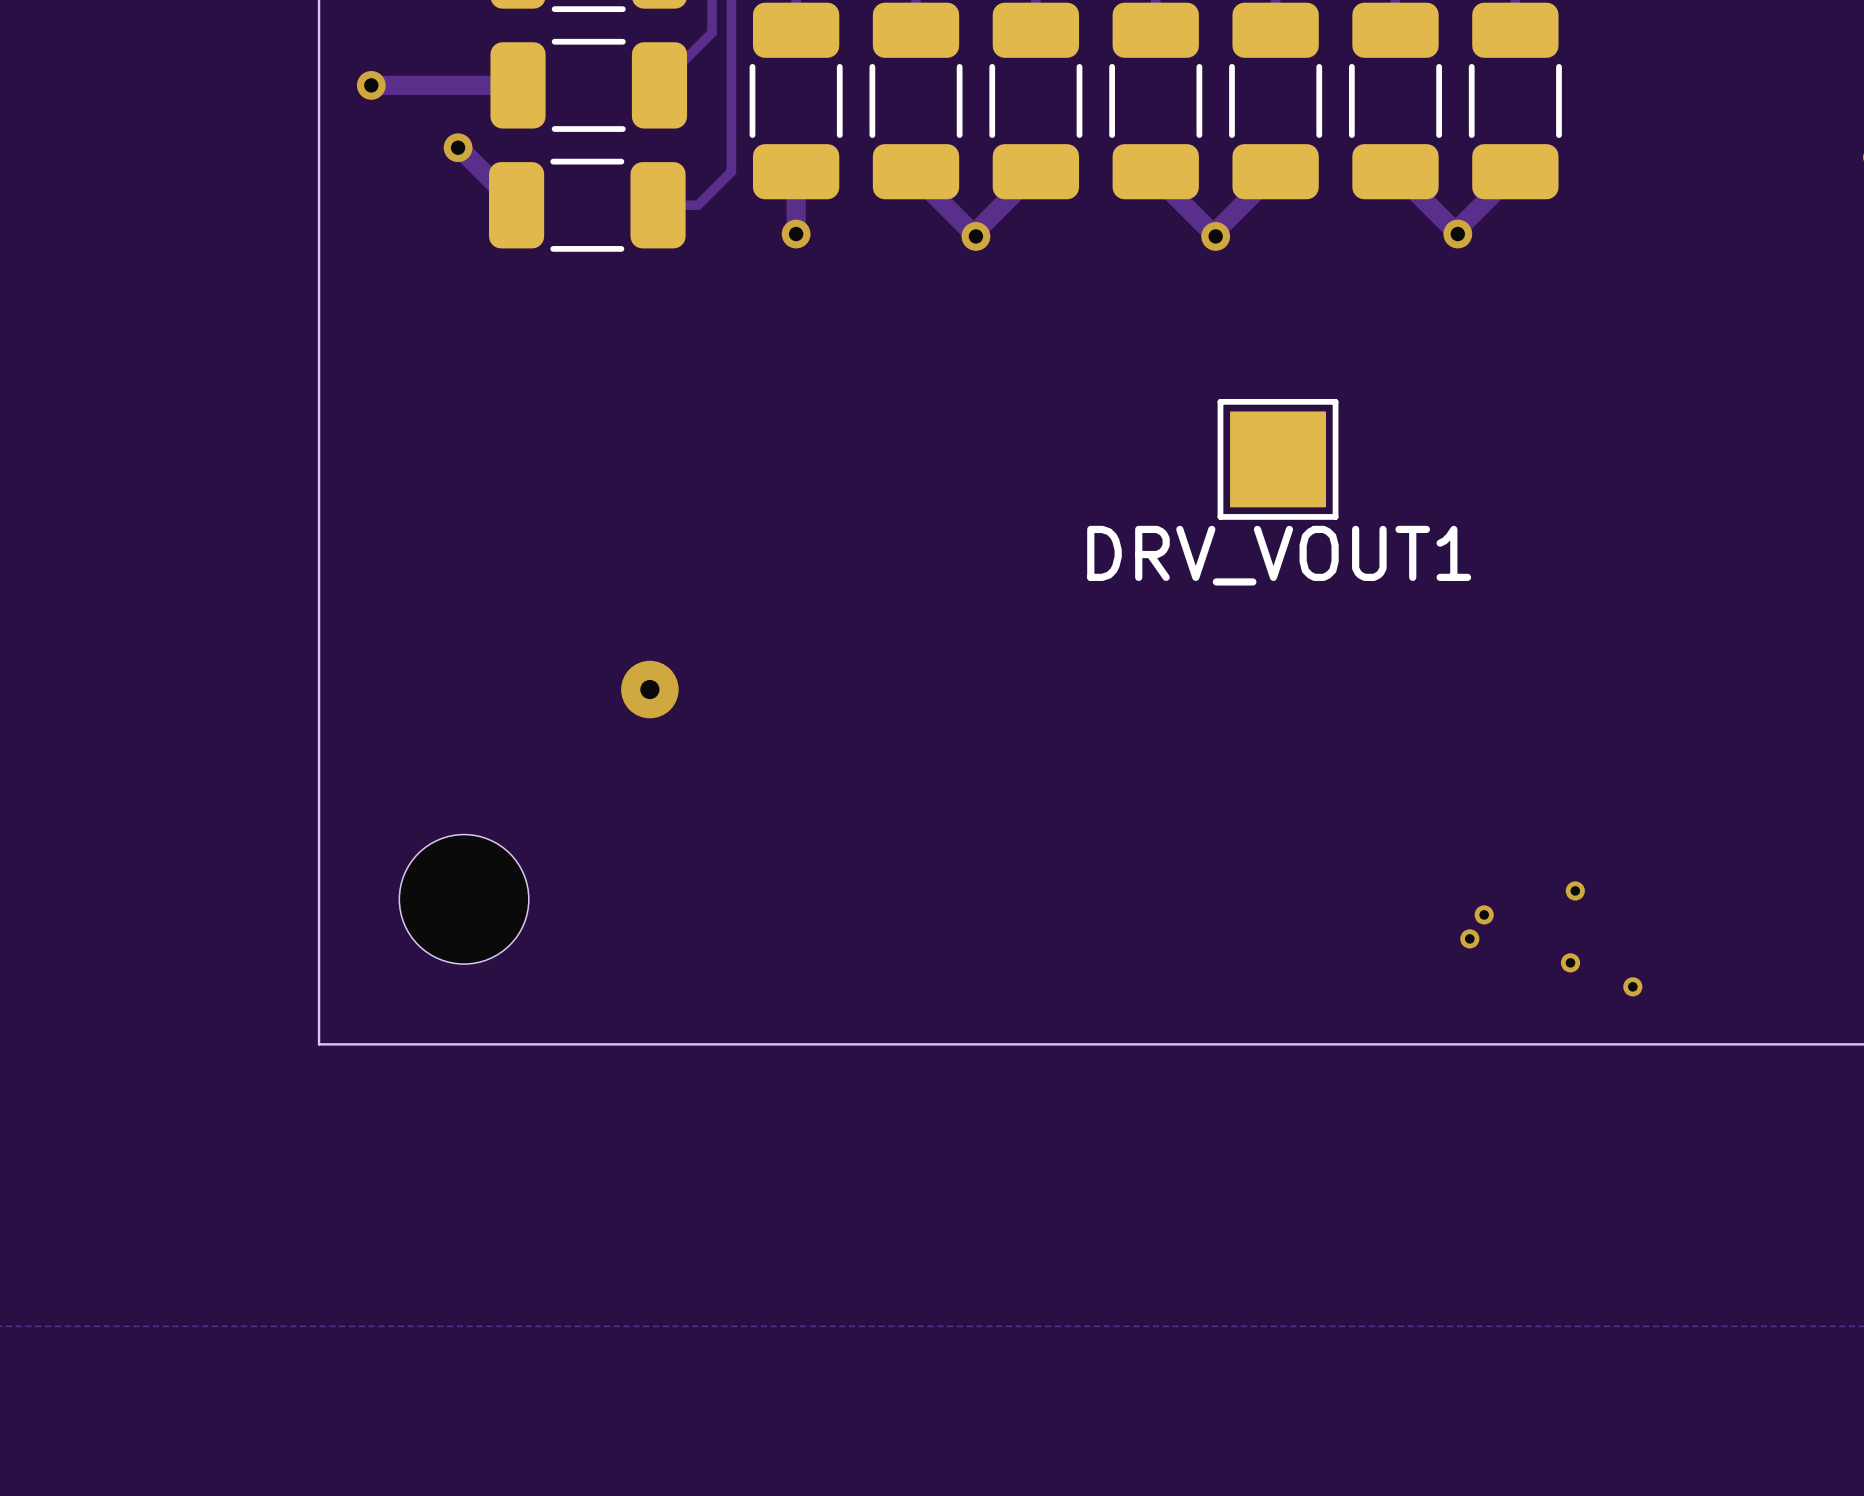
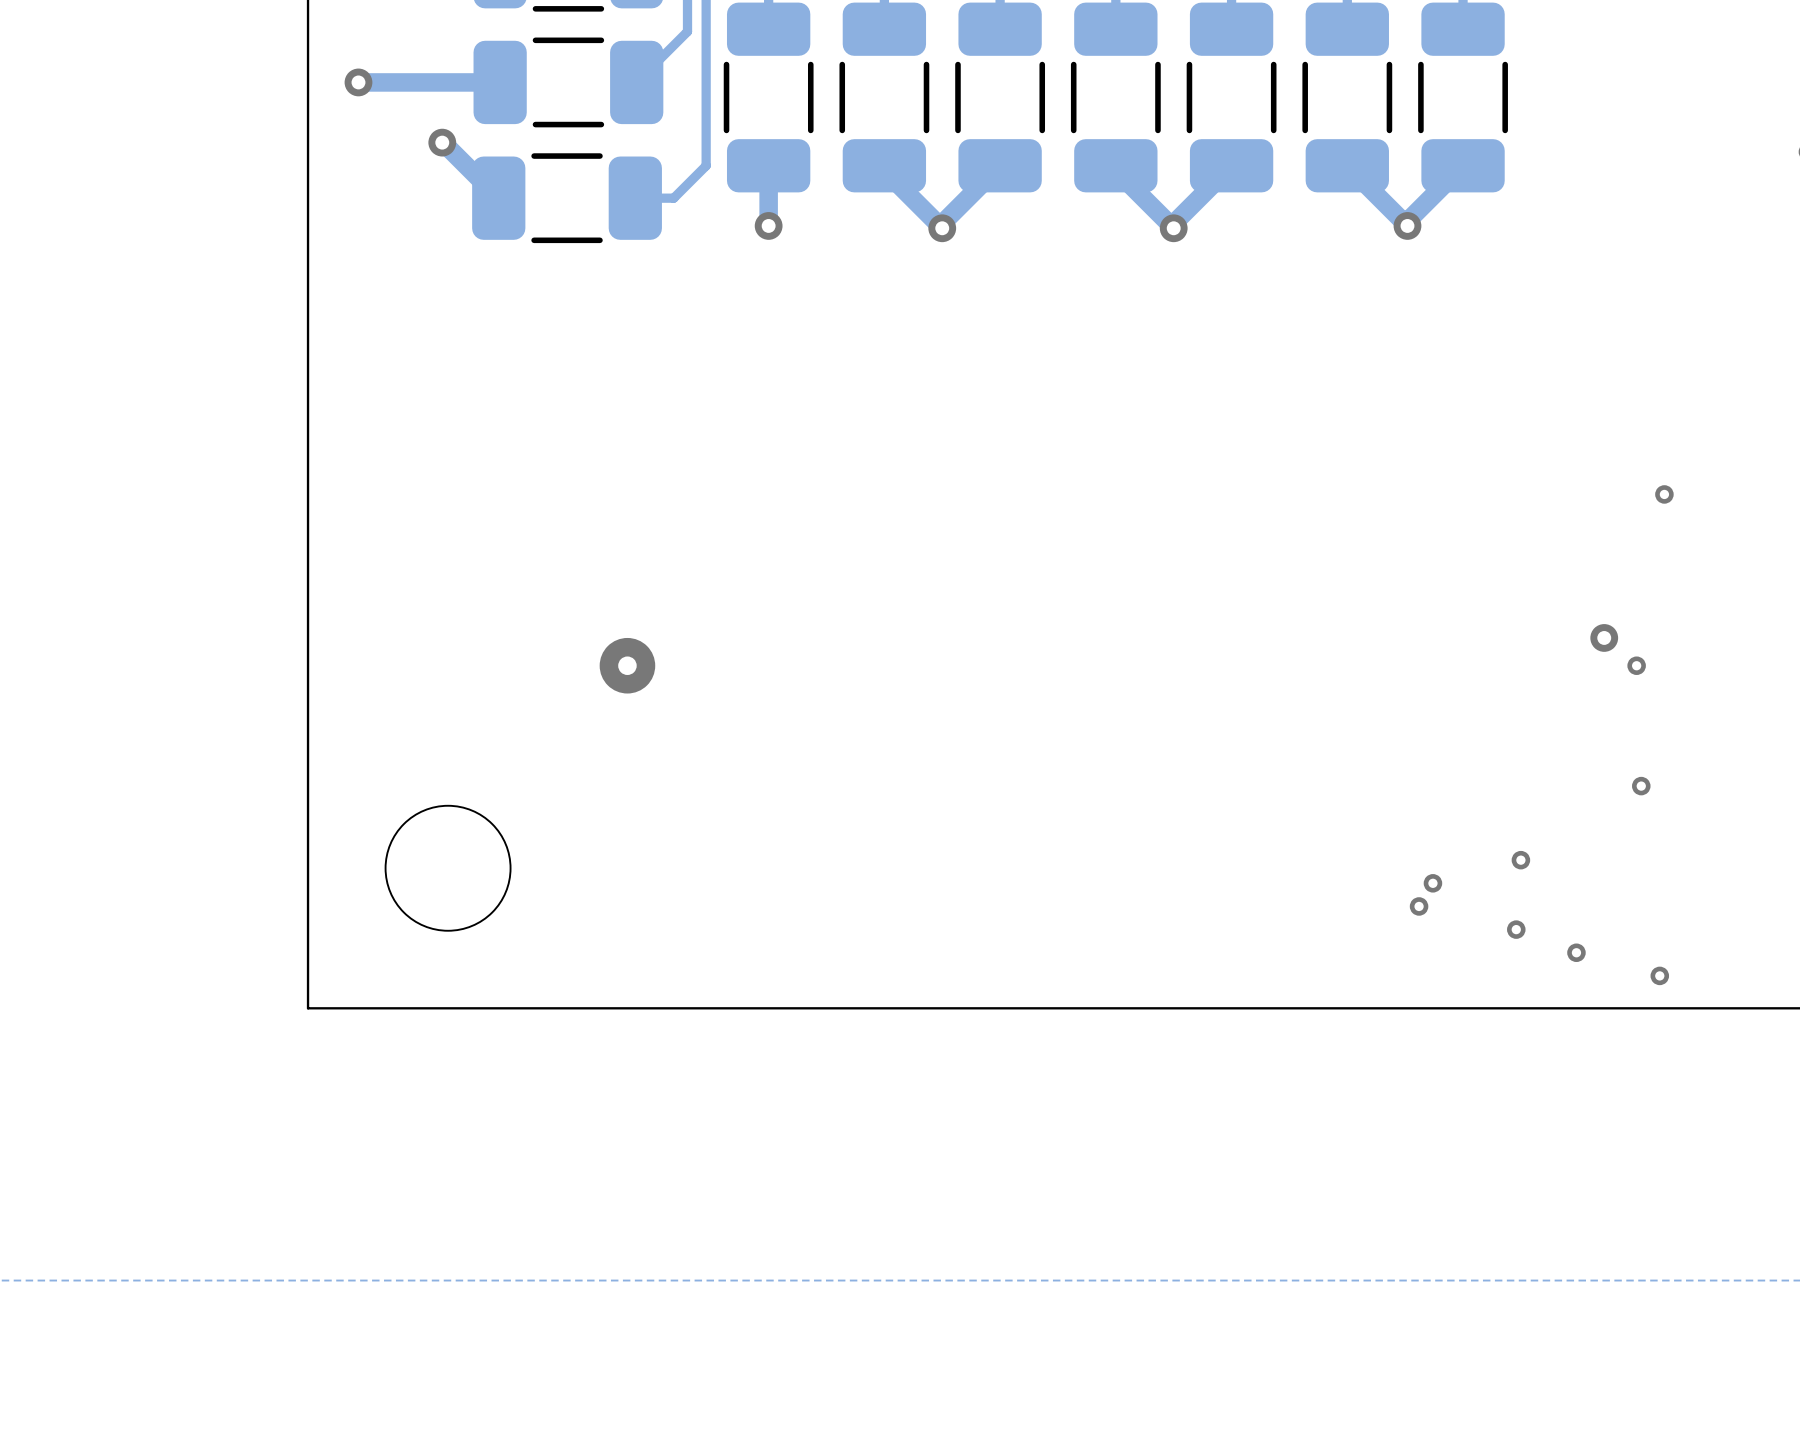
DRV_VOUT1: (1278, 459) -> none
via: none -> (1664, 494)
via: none -> (1604, 637)
via: none -> (1636, 665)
via: none -> (1641, 786)
via: none -> (1659, 975)

